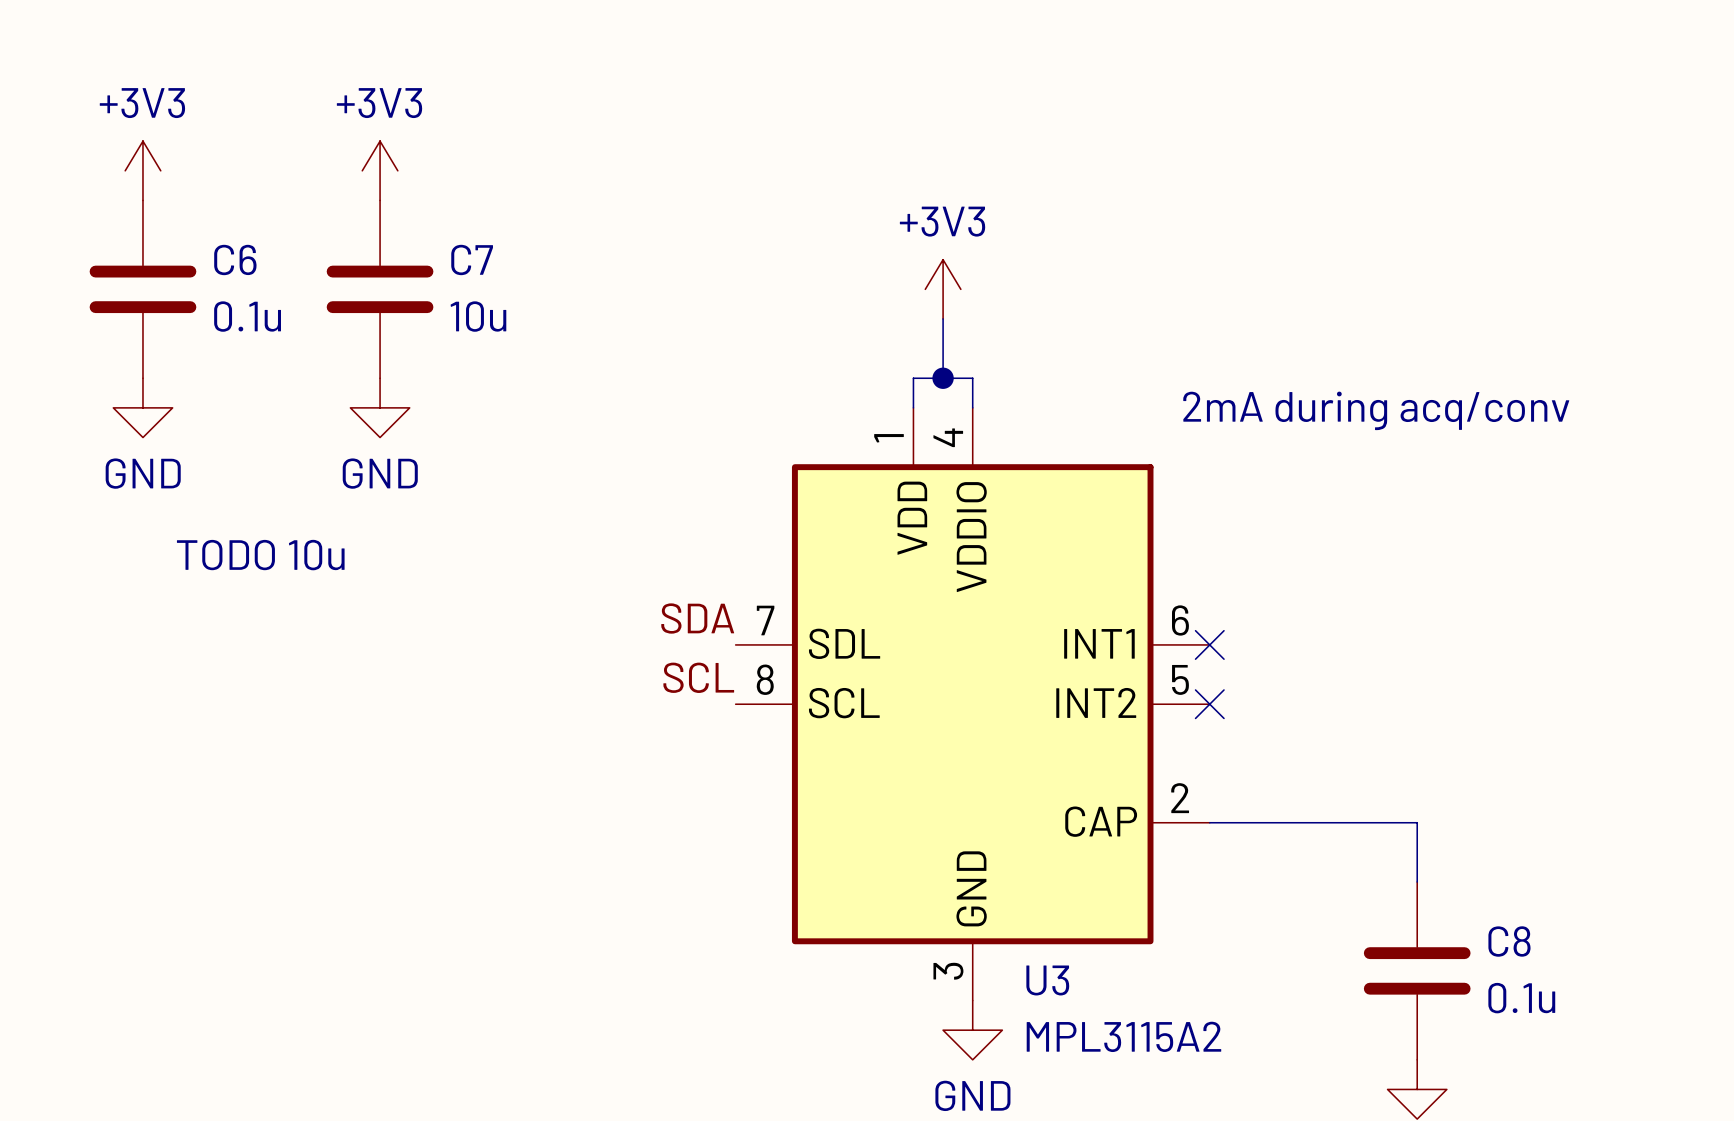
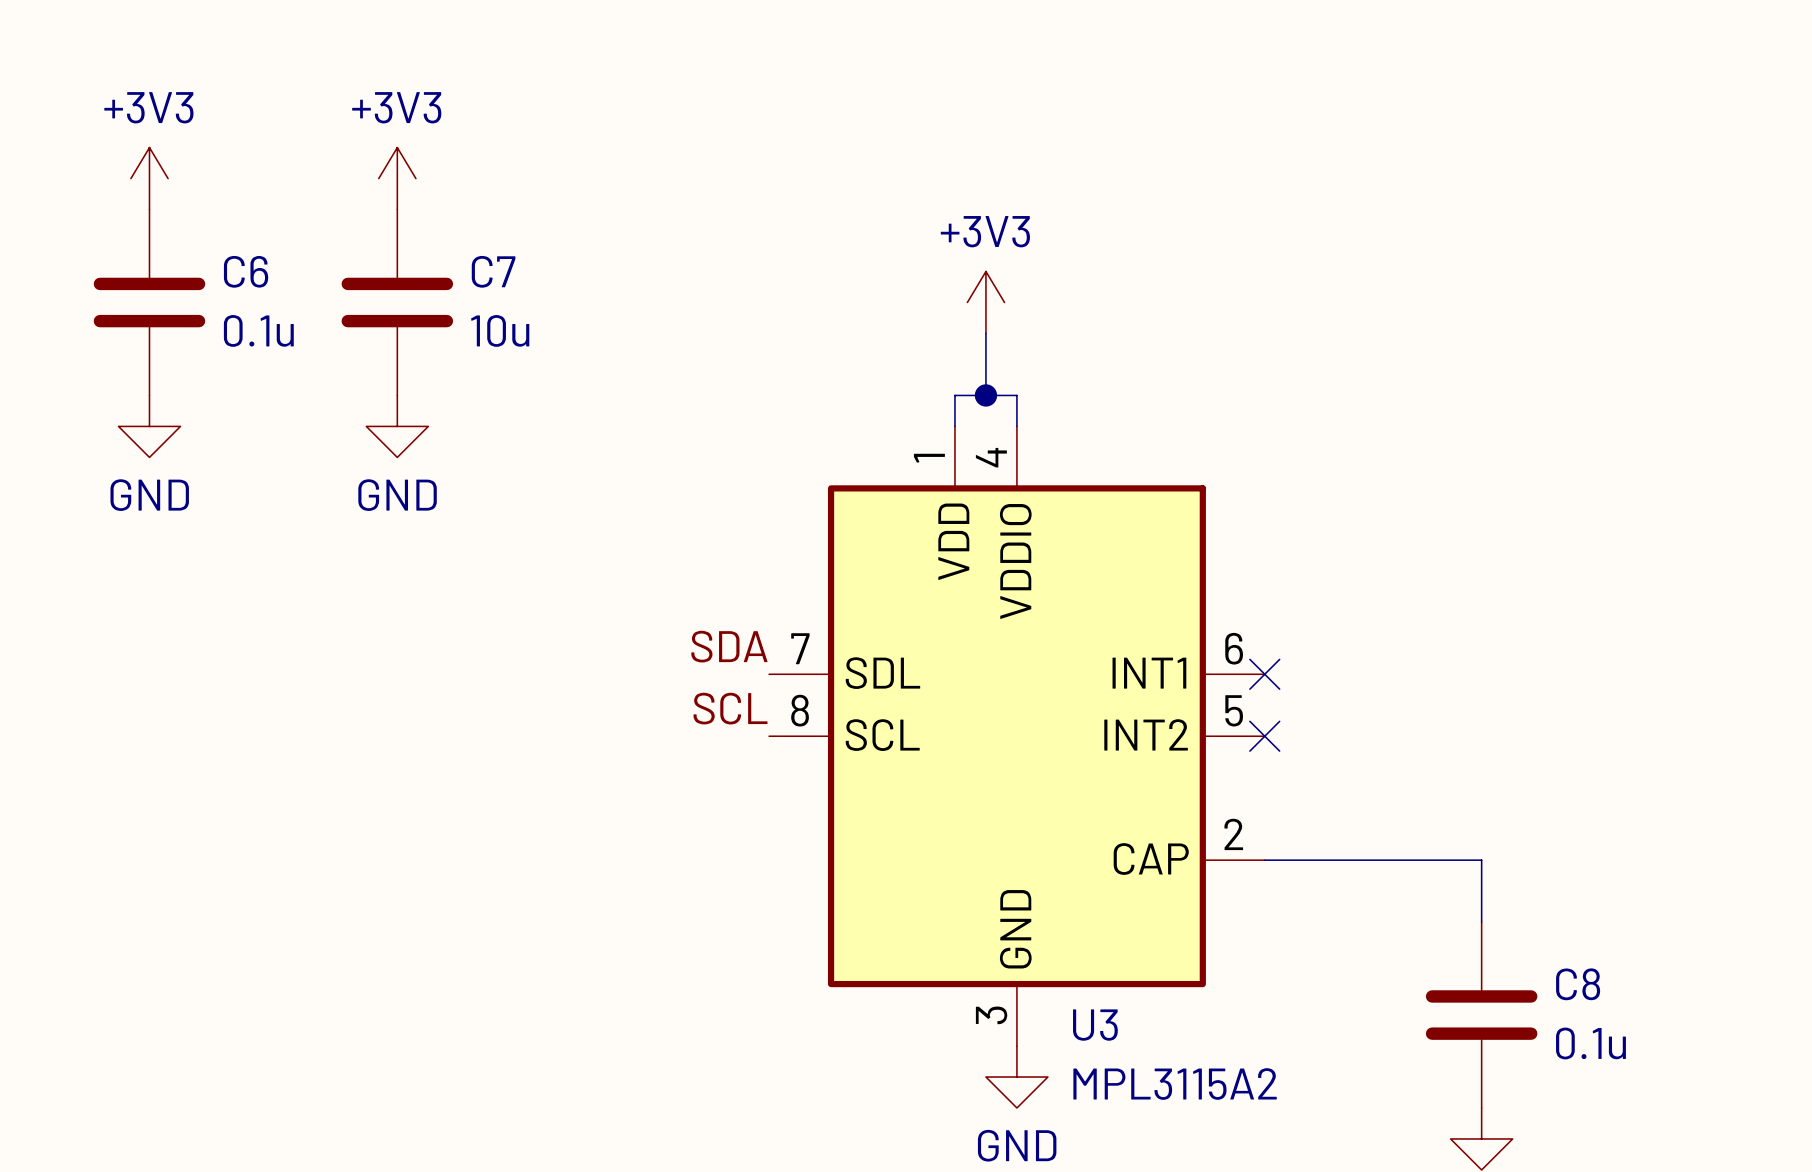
text: 2mA during acq/conv (1376, 410) -> none
text: TODO 10u (260, 555) -> none

